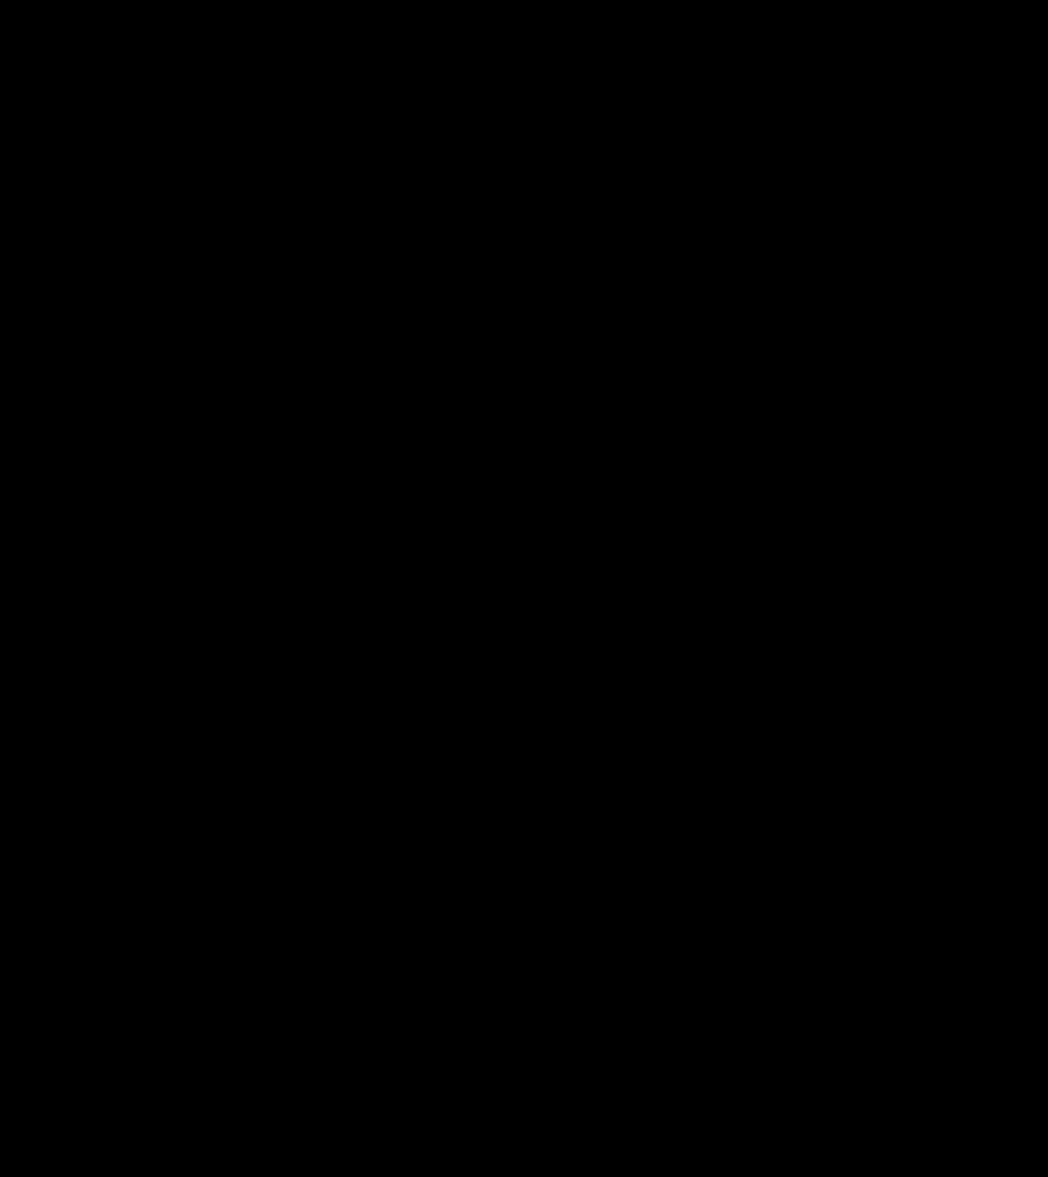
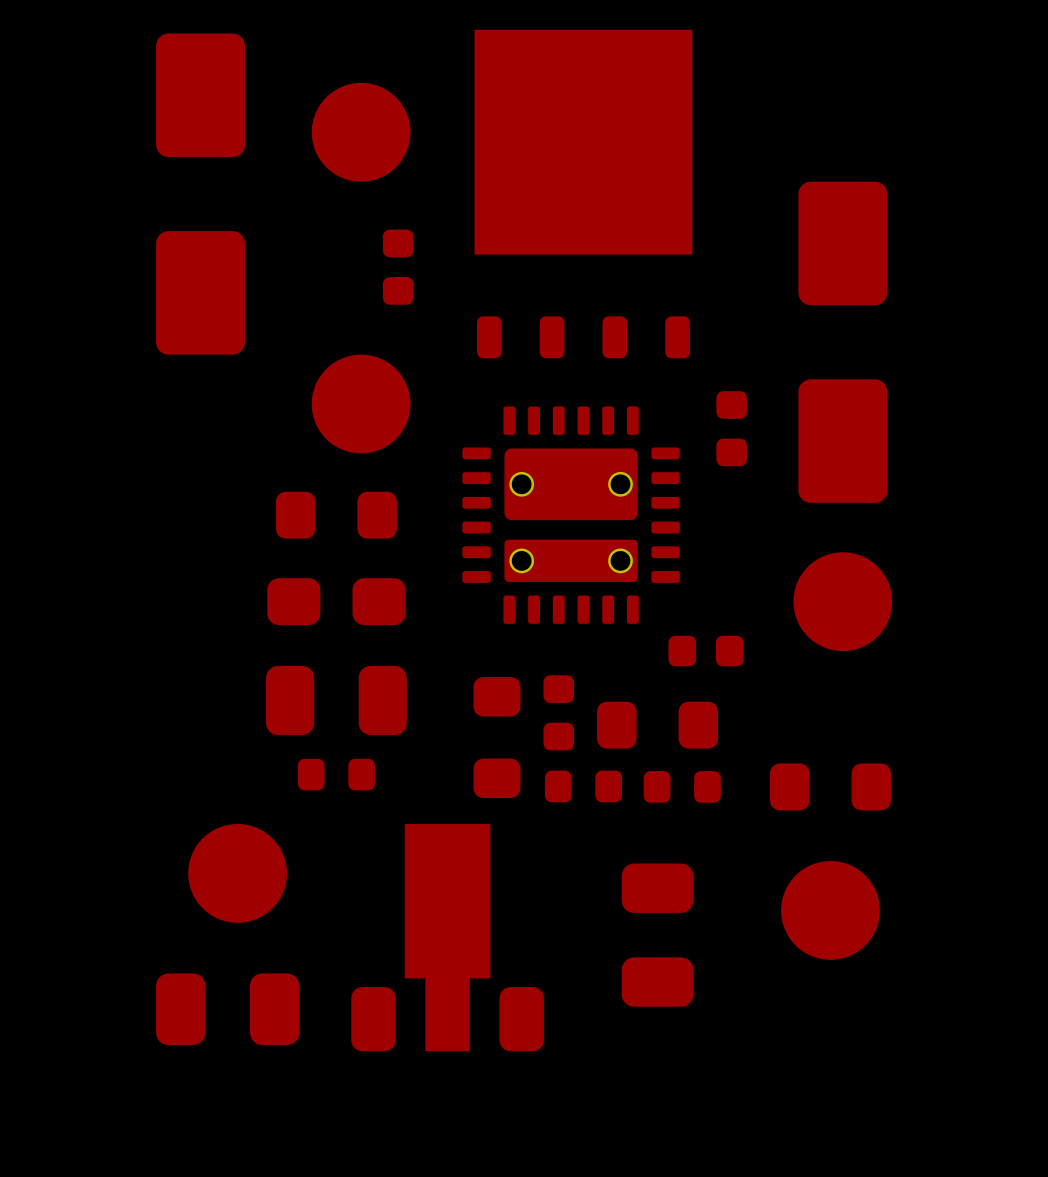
part: none -> (361, 132)
part: none -> (200, 194)
part: none -> (583, 194)
part: none -> (398, 267)
part: none -> (842, 342)
part: none -> (361, 404)
part: none -> (731, 428)
part: none -> (336, 515)
part: none -> (571, 515)
part: none -> (336, 601)
part: none -> (842, 601)
part: none -> (705, 651)
part: none -> (336, 700)
part: none -> (558, 712)
part: none -> (657, 725)
part: none -> (496, 737)
part: none -> (336, 774)
part: none -> (583, 786)
part: none -> (682, 786)
part: none -> (830, 786)
part: none -> (237, 873)
part: none -> (830, 910)
part: none -> (657, 935)
part: none -> (447, 937)
part: none -> (227, 1009)

